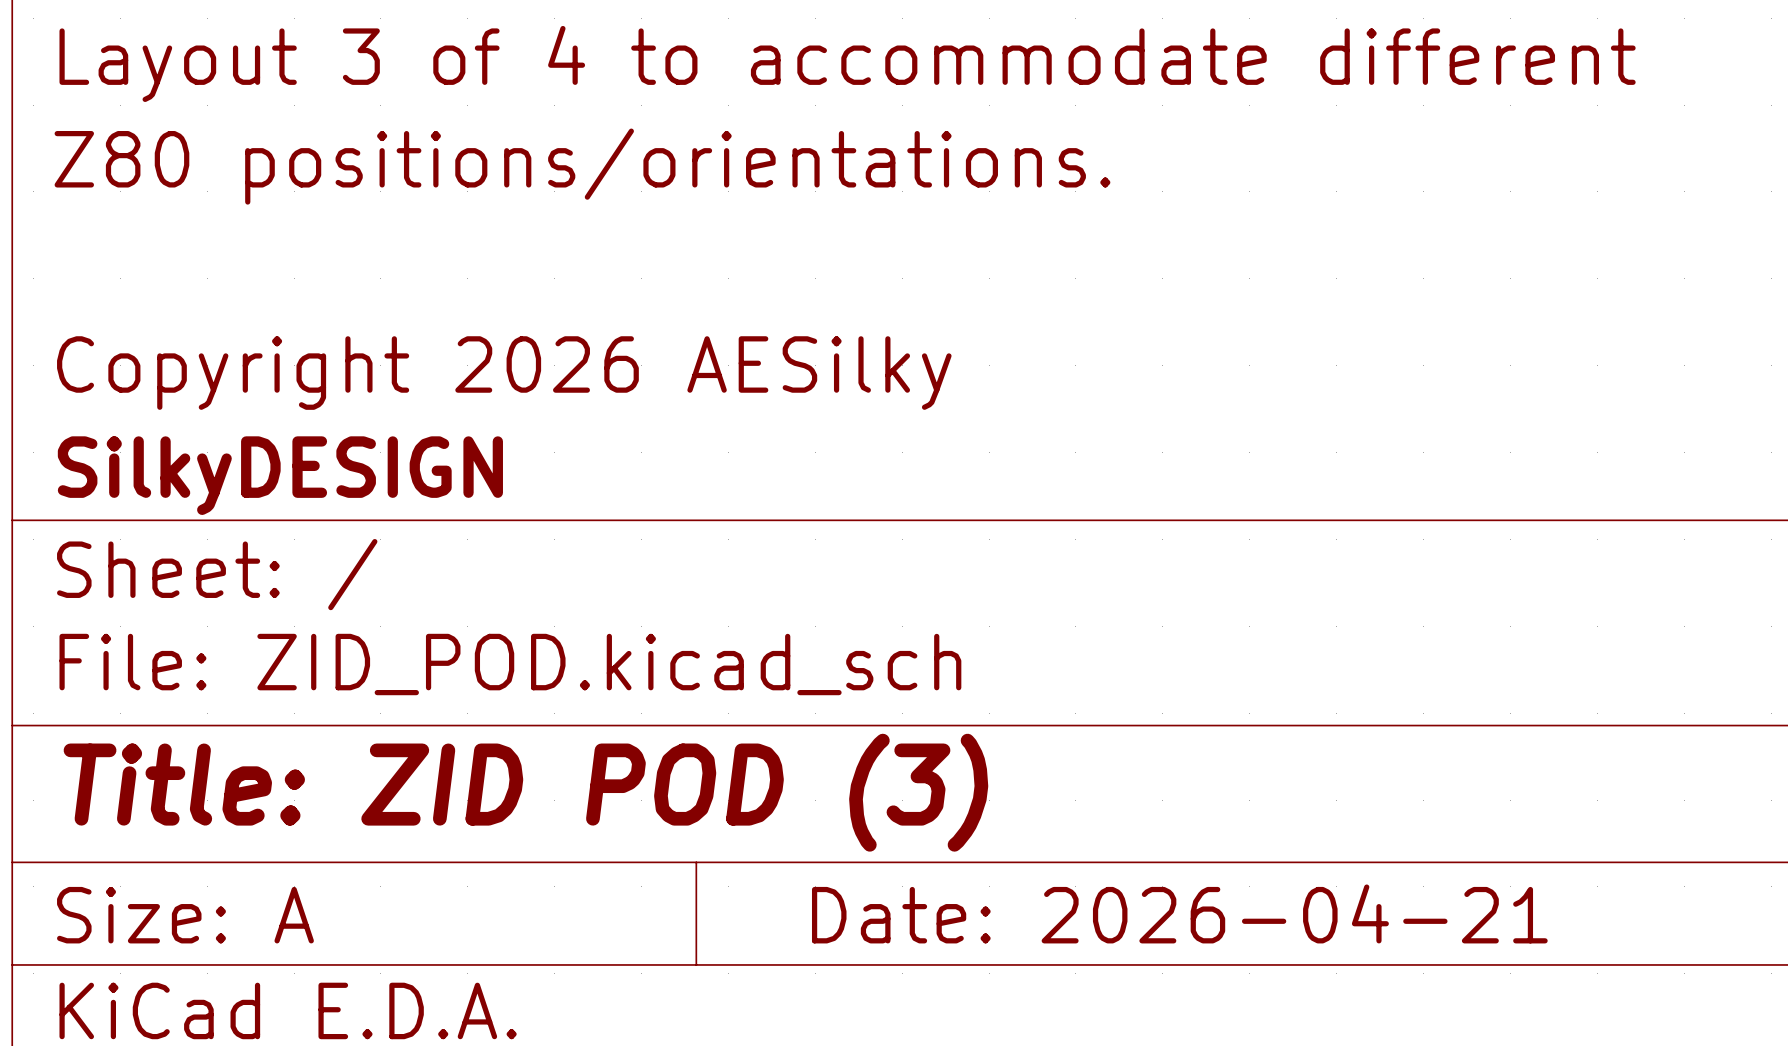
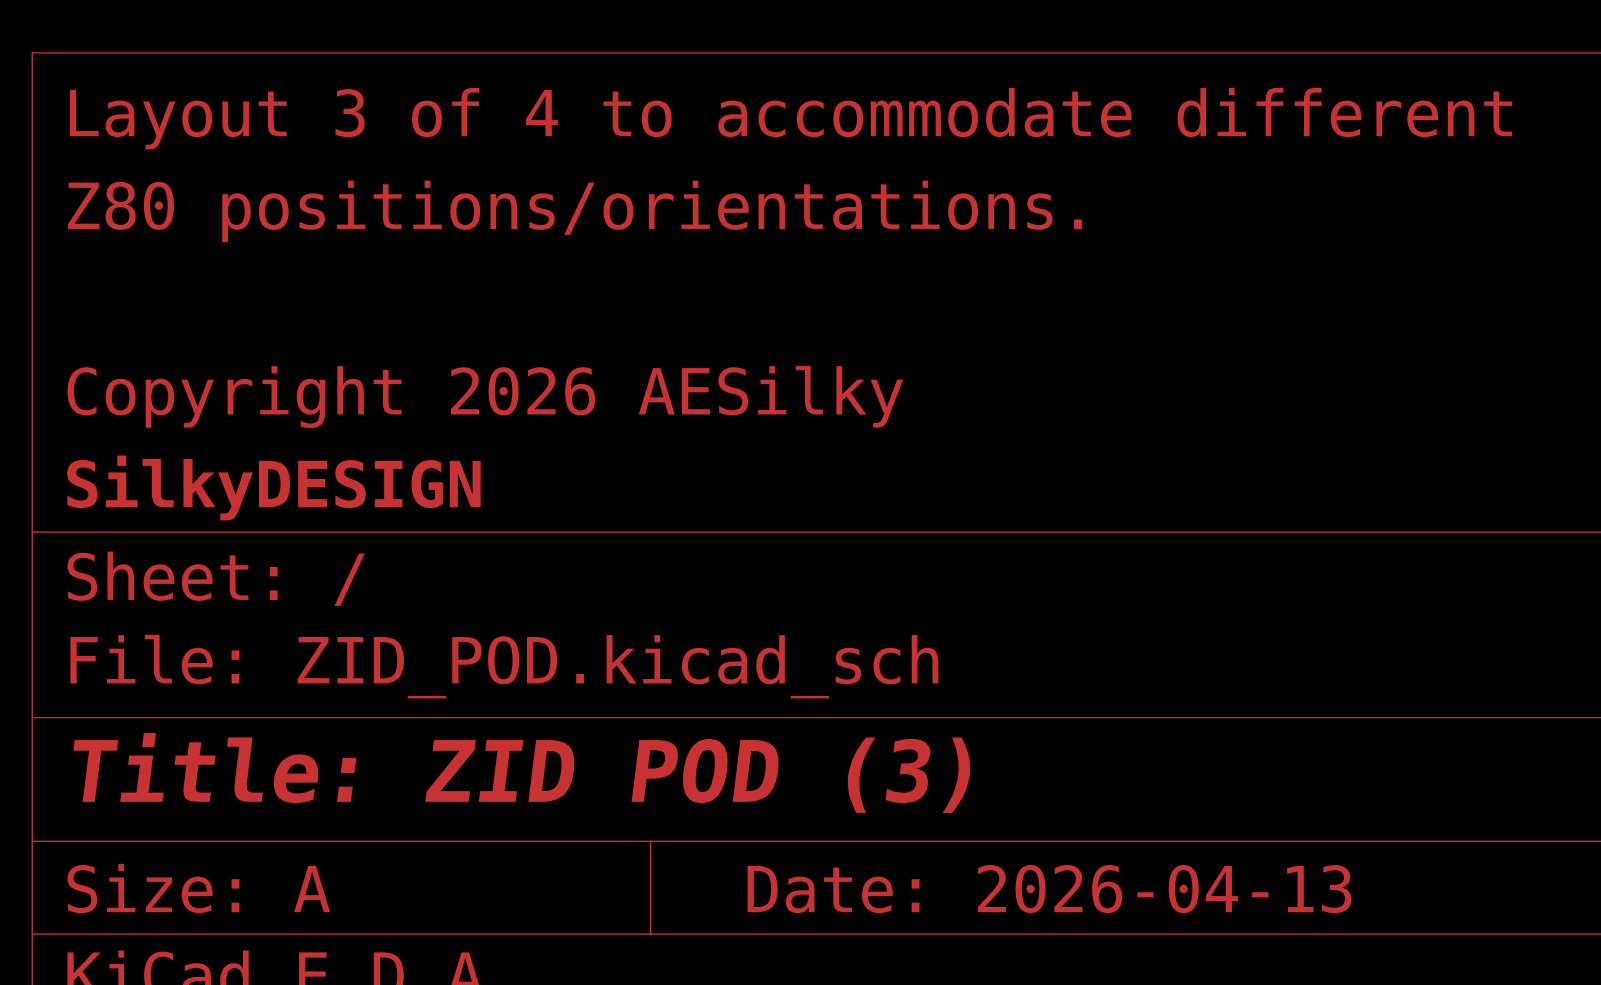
title block: Date: 2026-04-21 (1179, 913) -> Date: 2026-04-13 (1049, 889)

